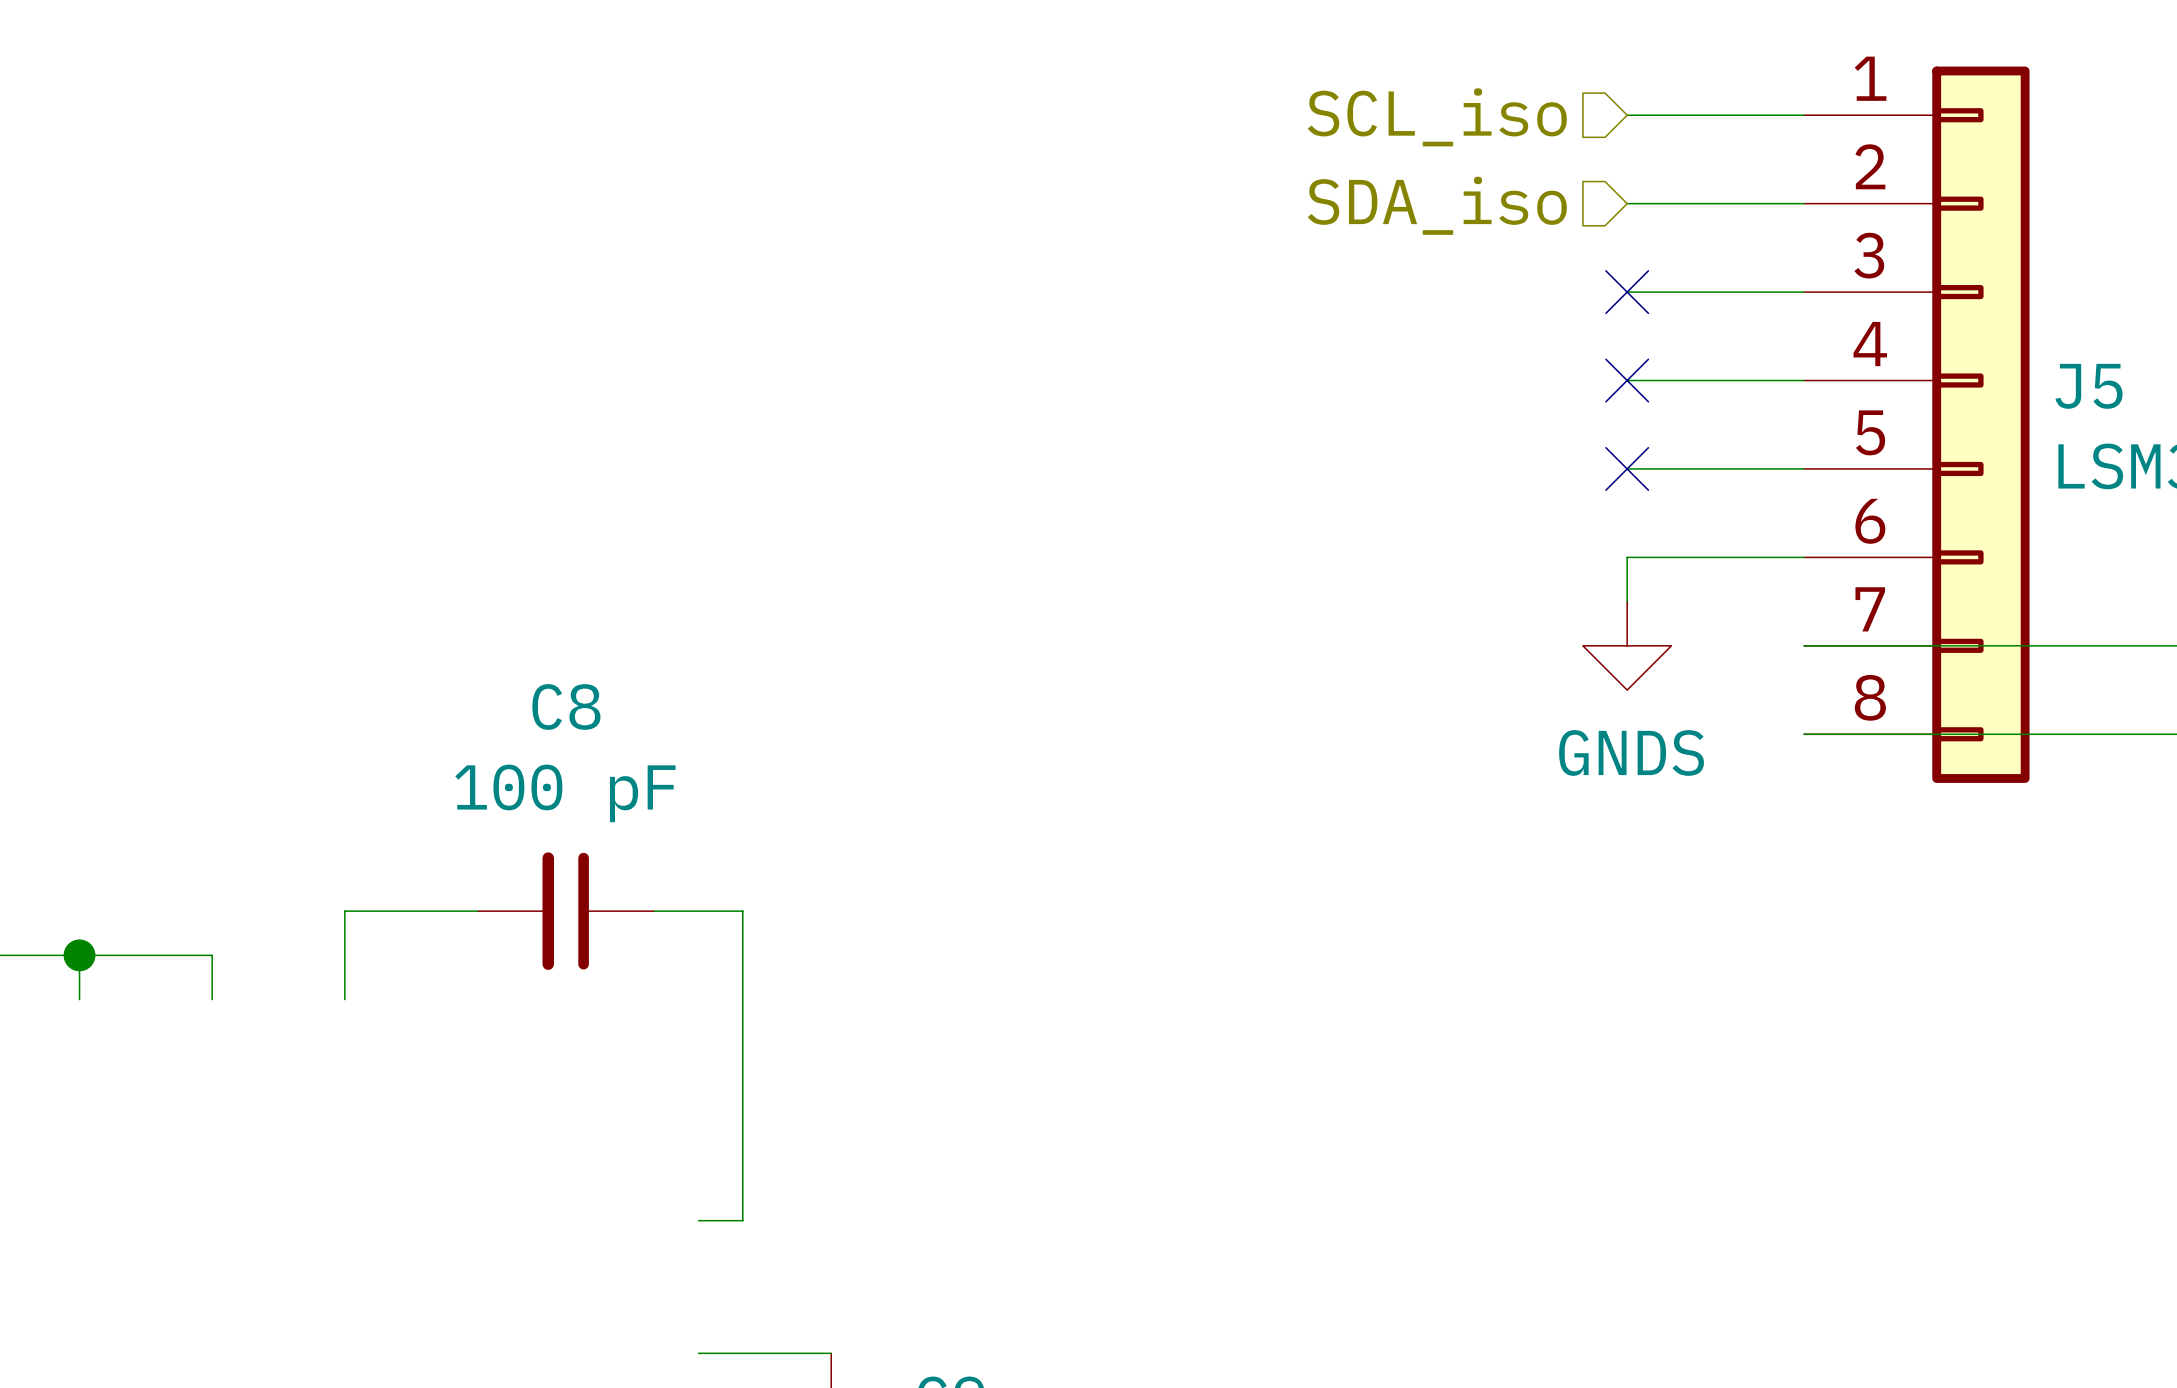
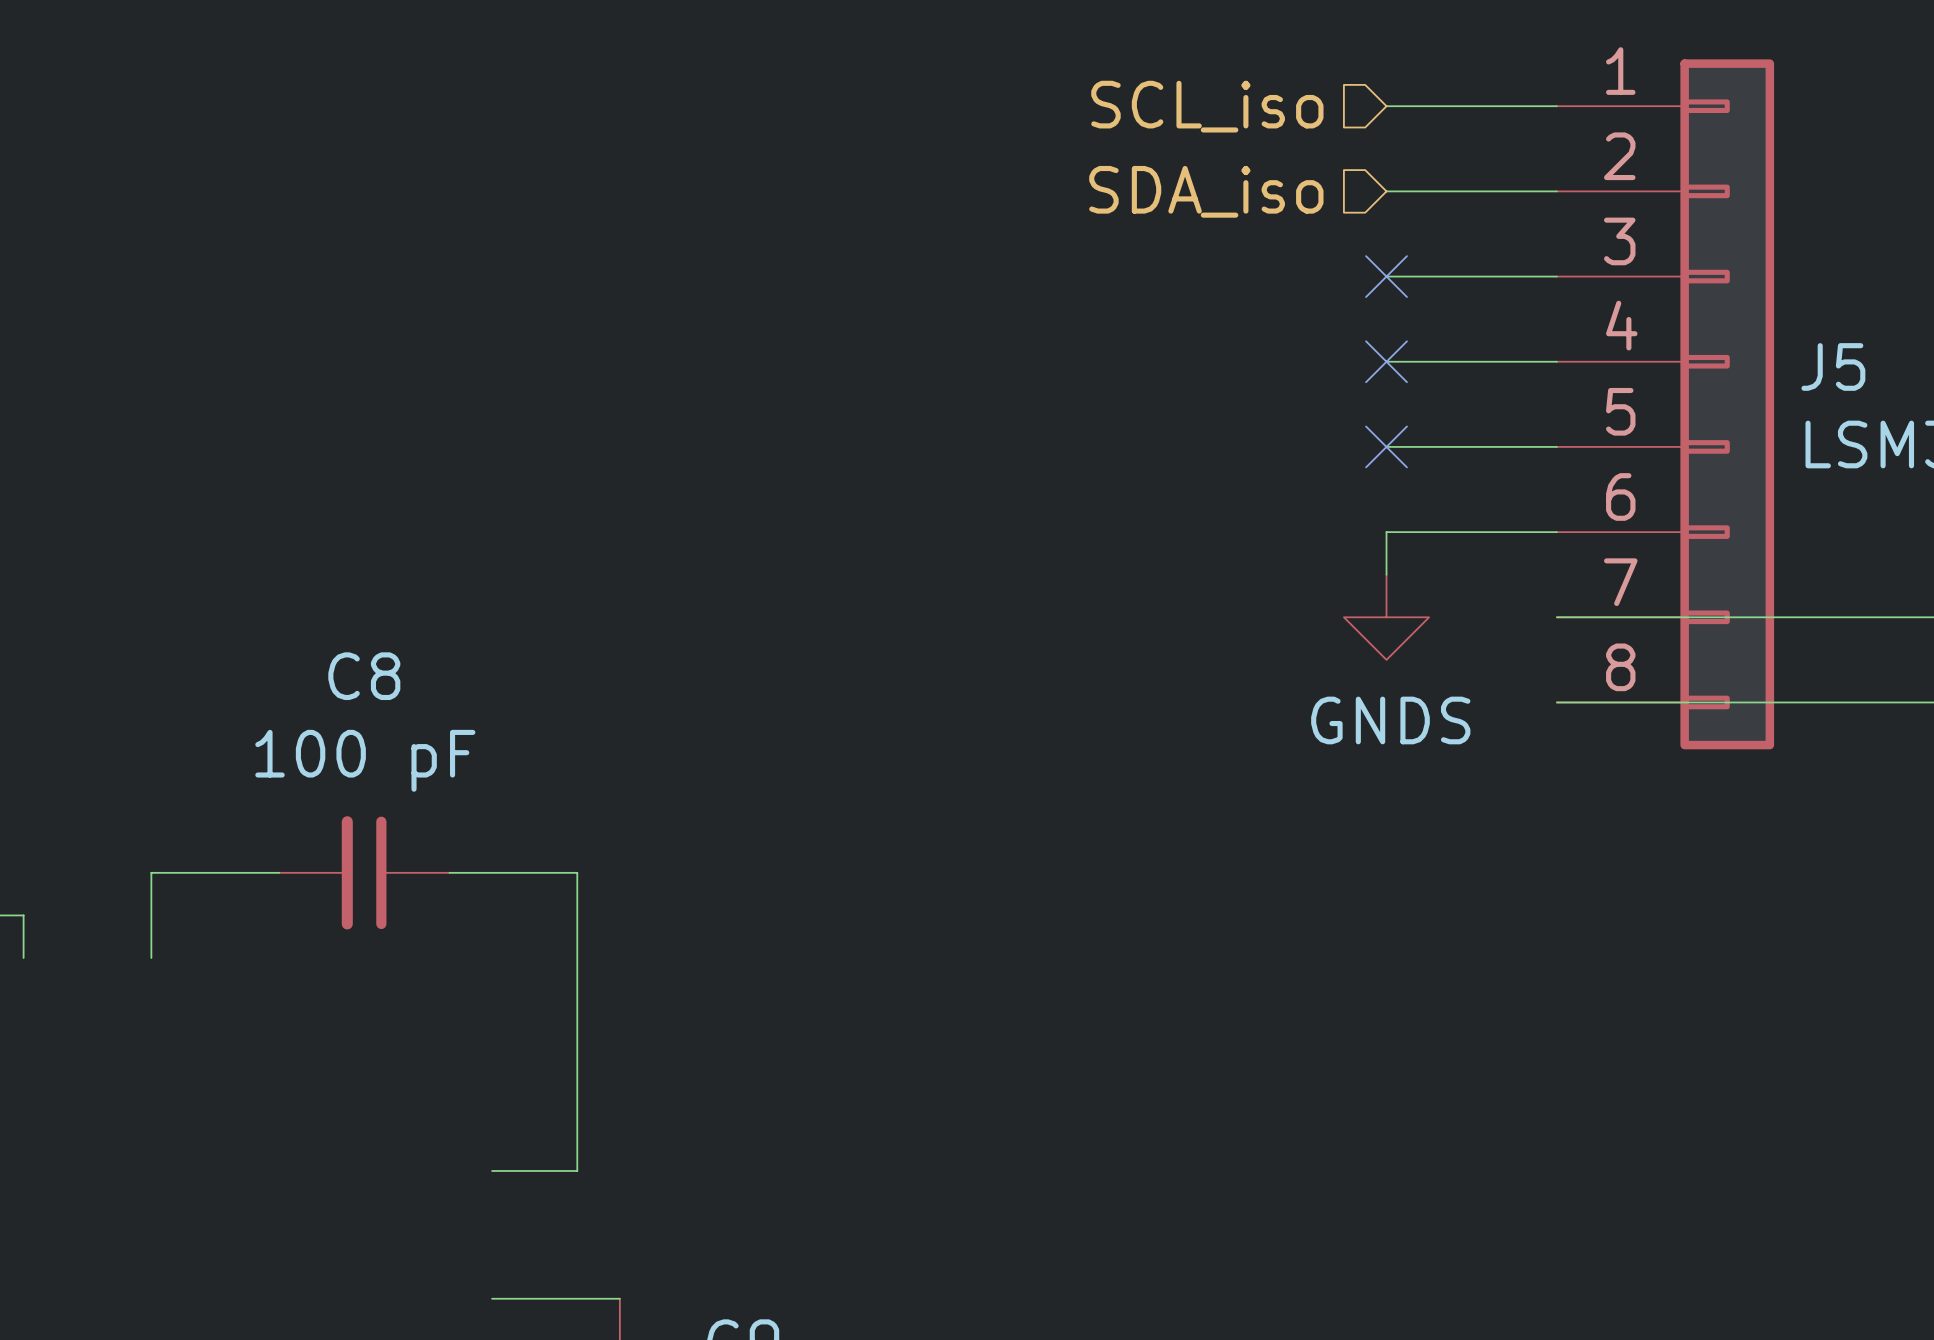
wire: (742, 911) (742, 1220) -> (534, 872) (577, 872) (577, 1170) (534, 1170)

